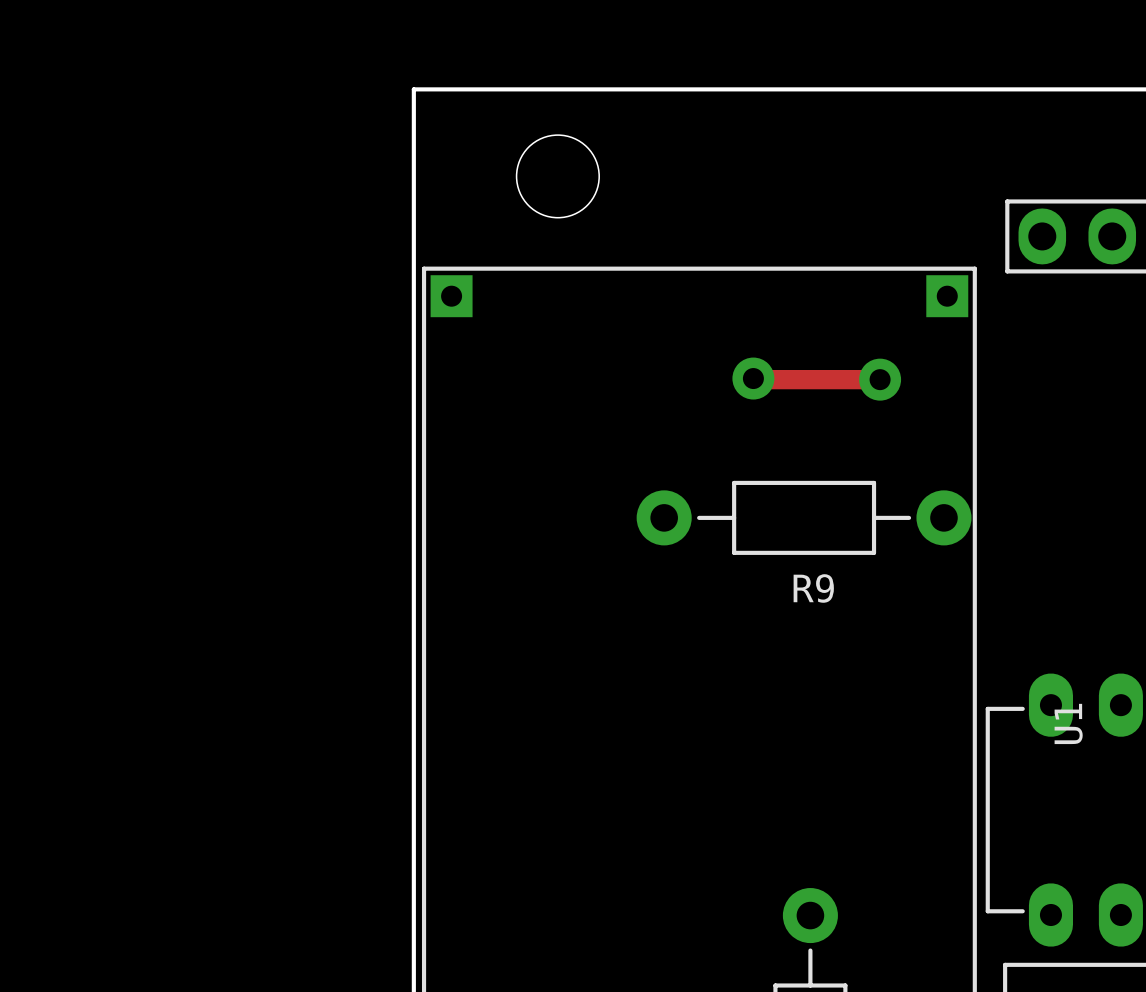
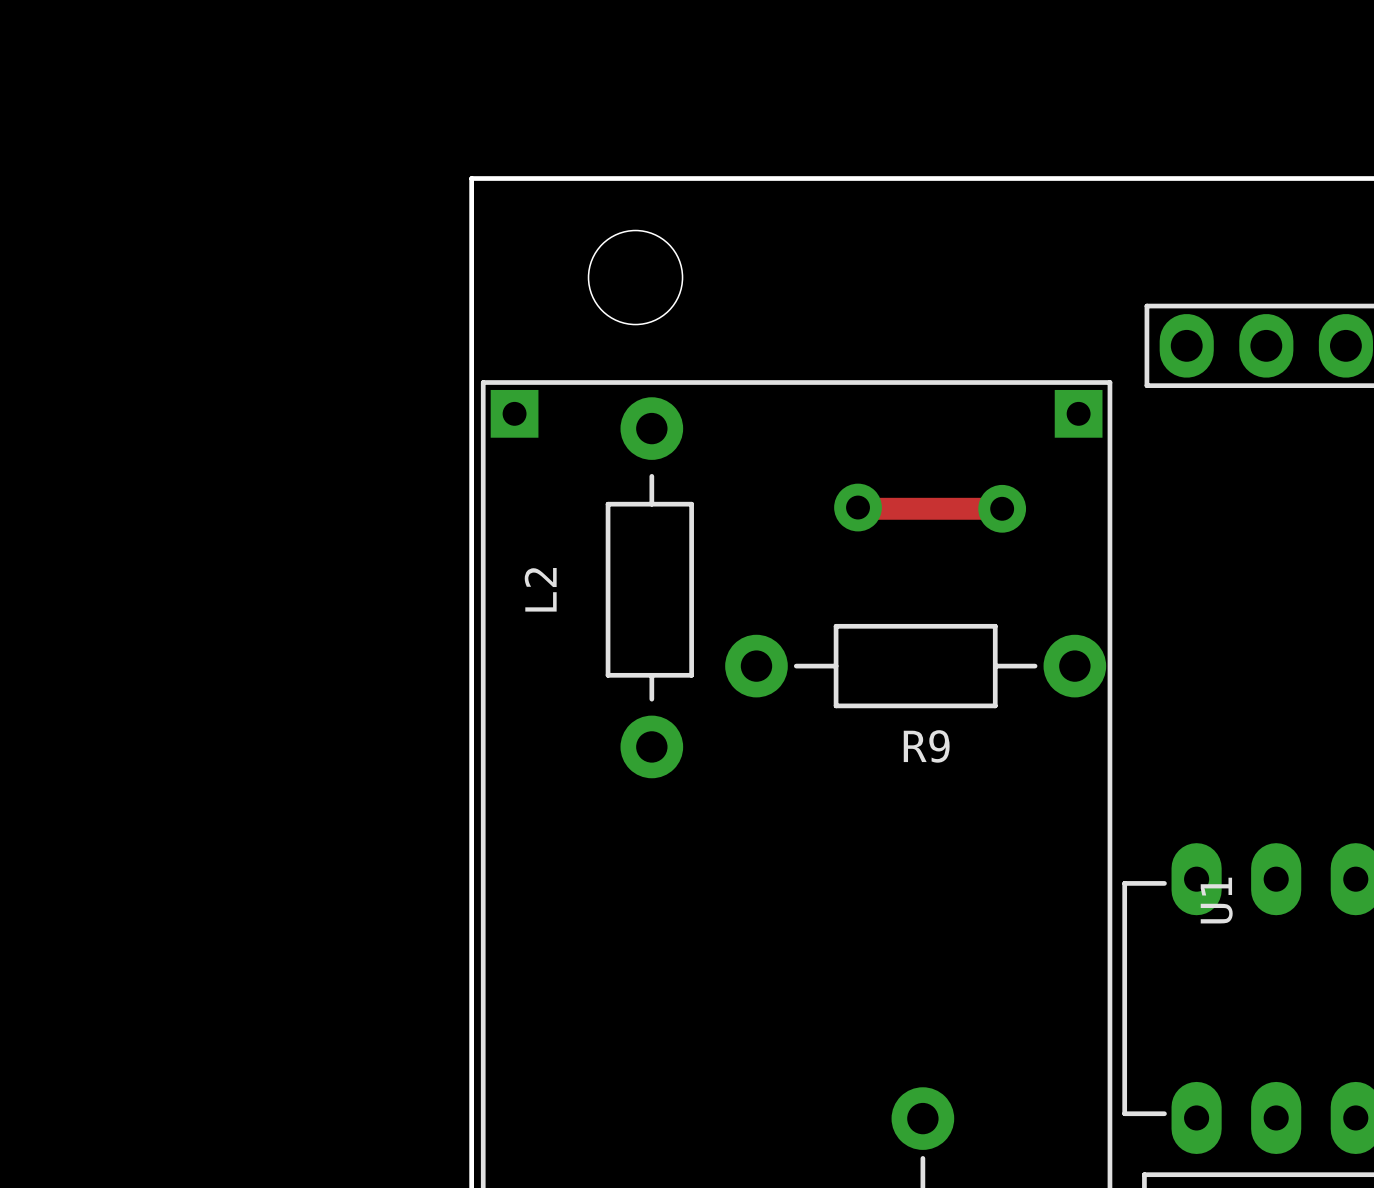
L2: none -> (649, 587)

